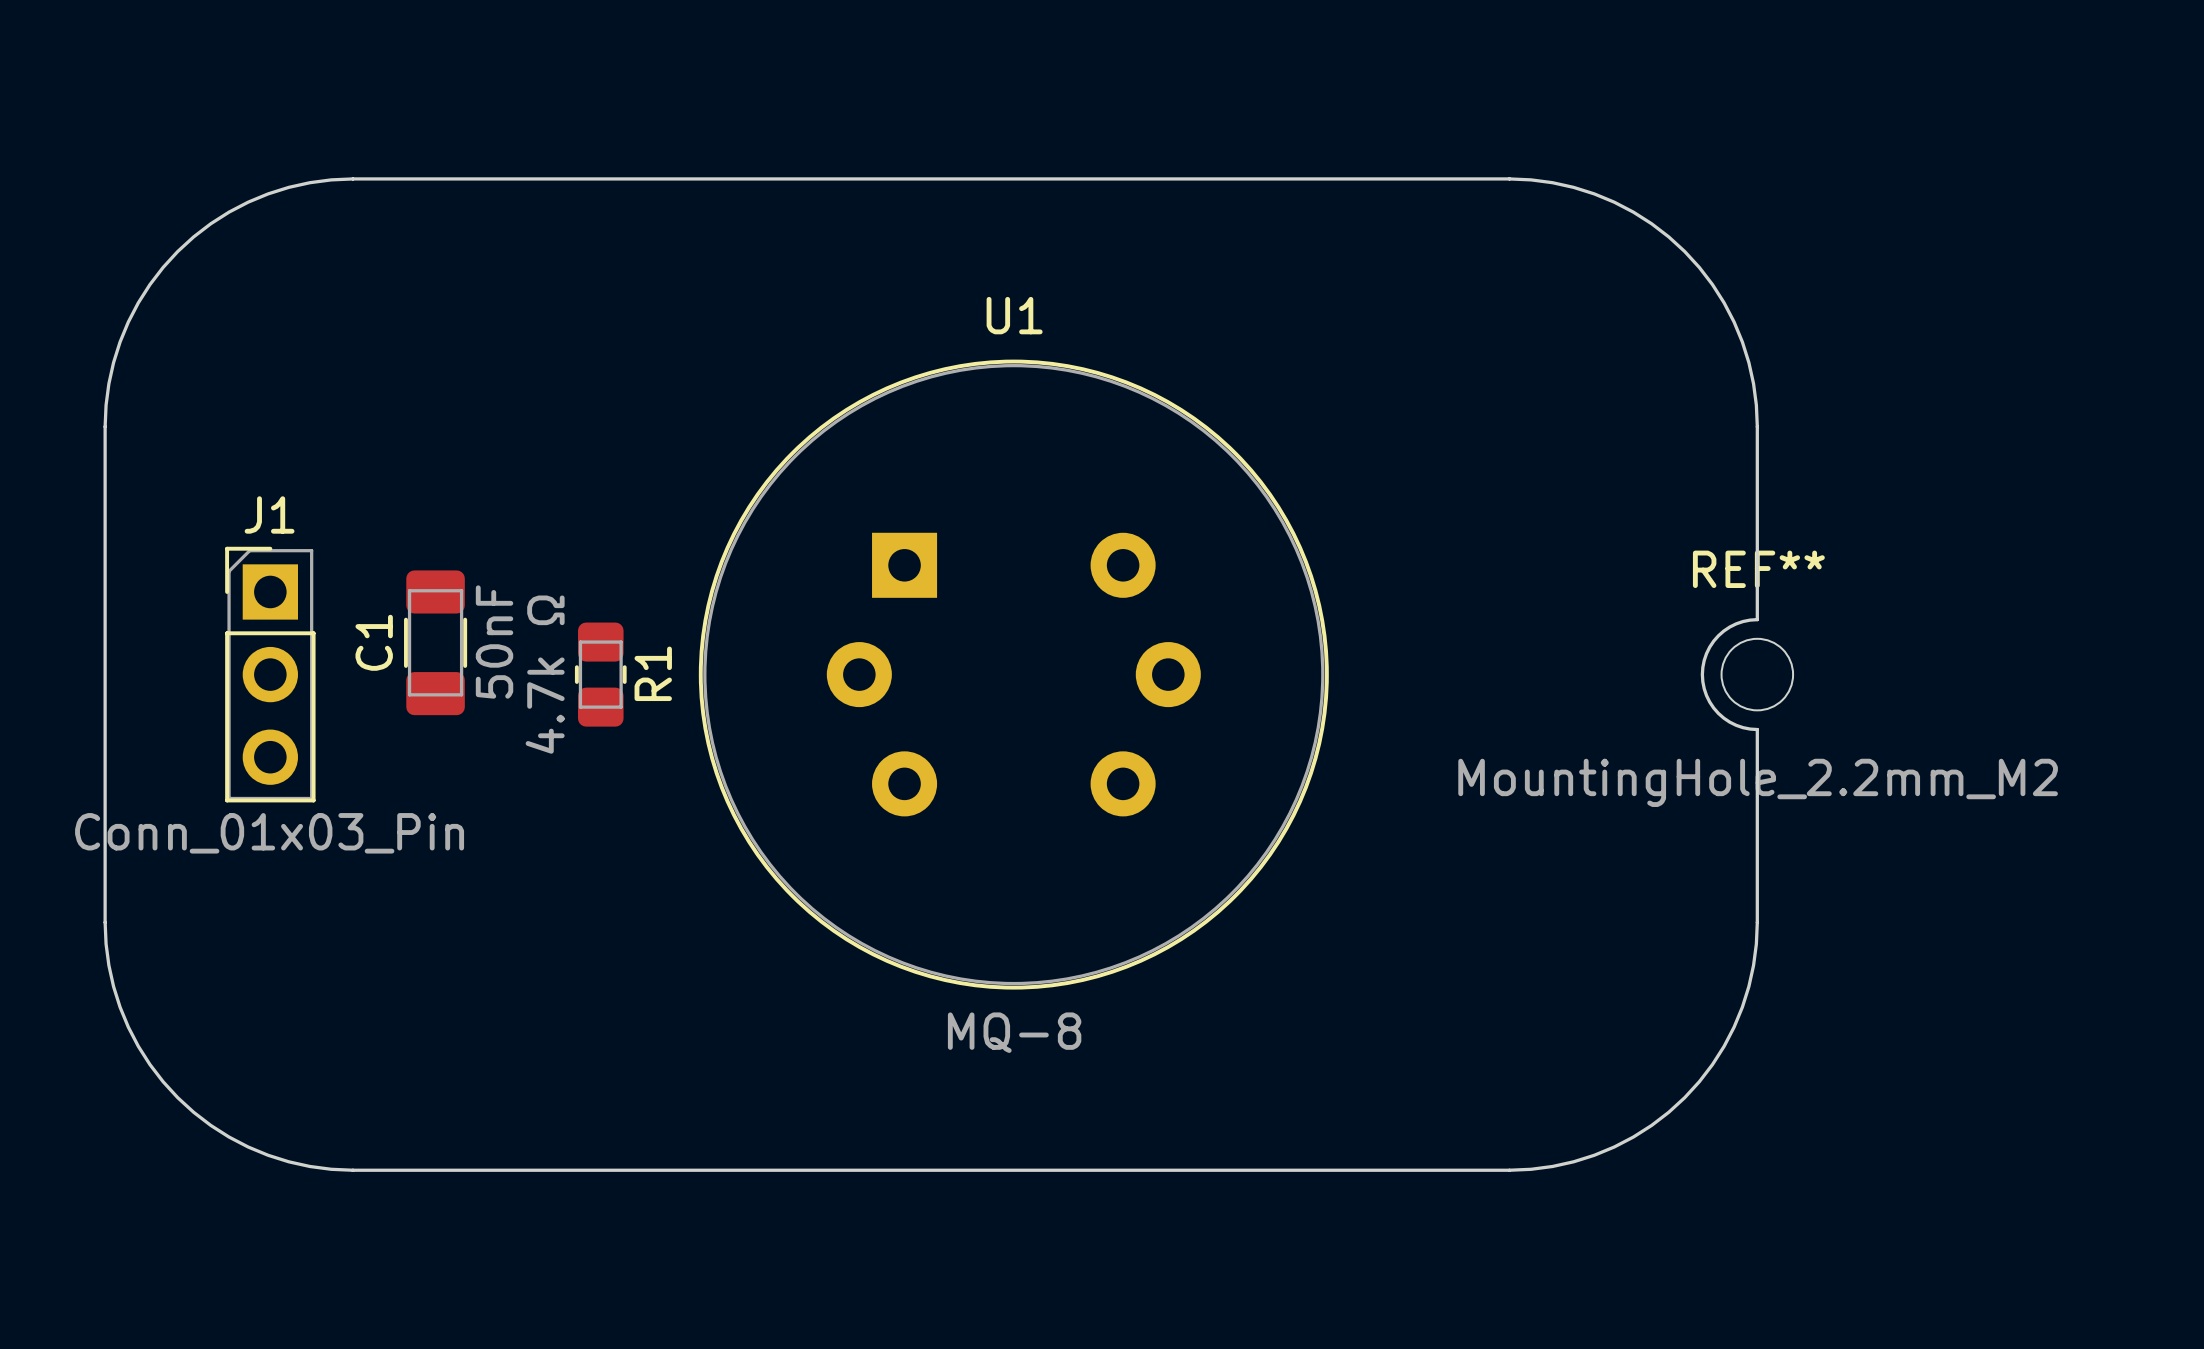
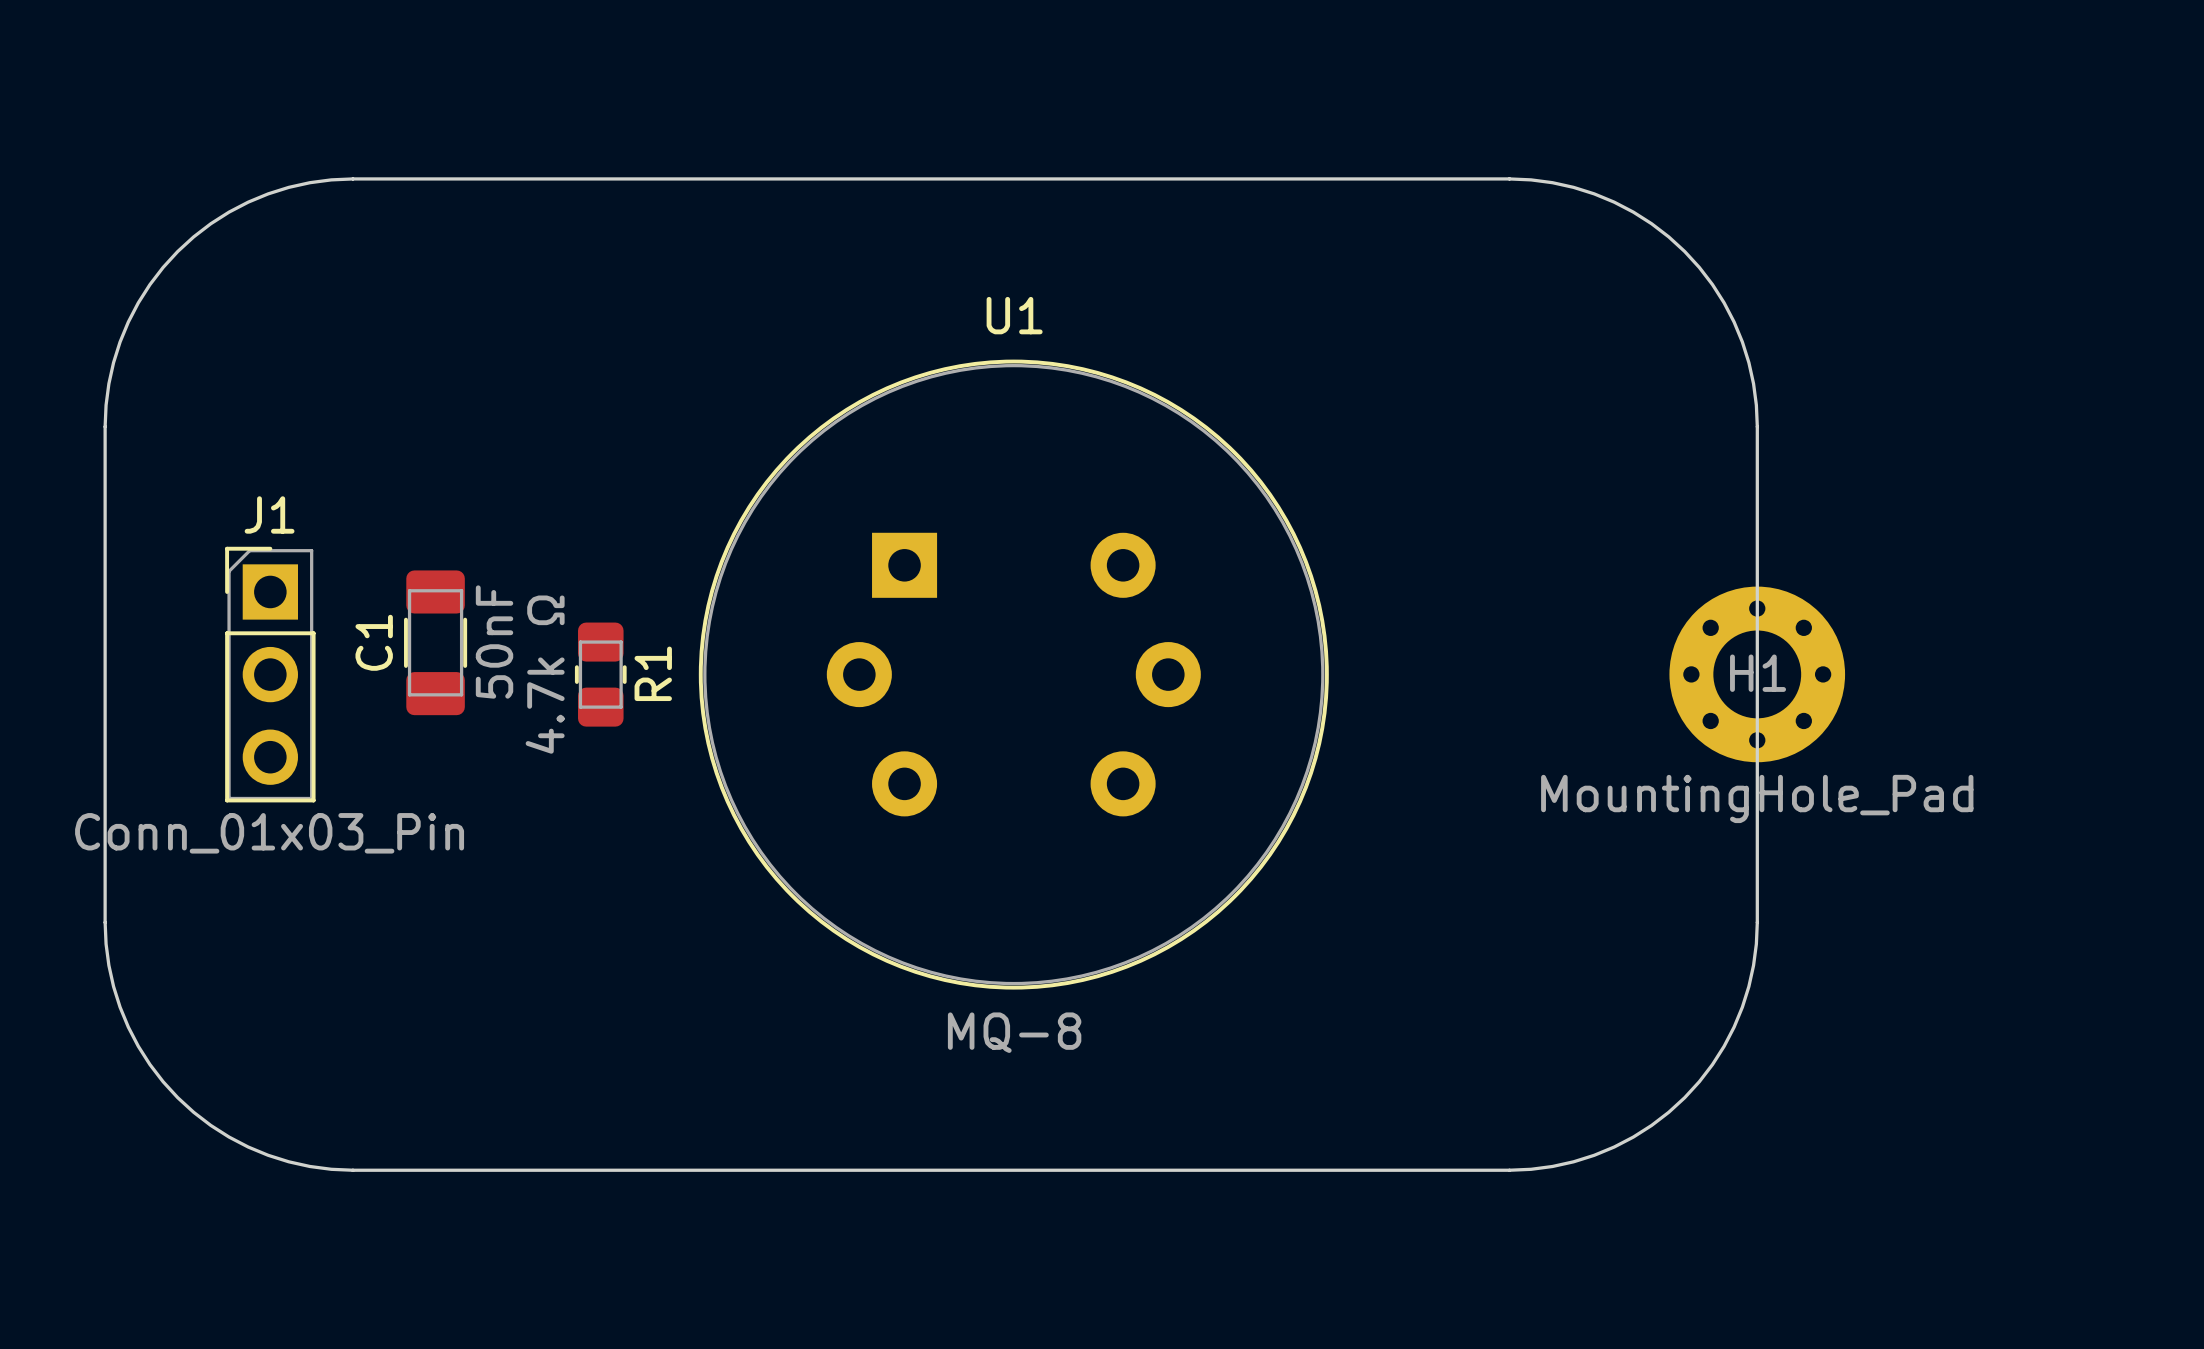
board edge: (1757, 619) (1736, 623) (1718, 635) (1706, 653) (1702, 674) (1706, 695) (1718, 713) (1736, 725) (1757, 729) -> (1757, 619) (1757, 729)
REF**: MountingHole_2.2mm_M2 (1757, 674) -> none
H1: none -> MountingHole_Pad (1757, 674)

